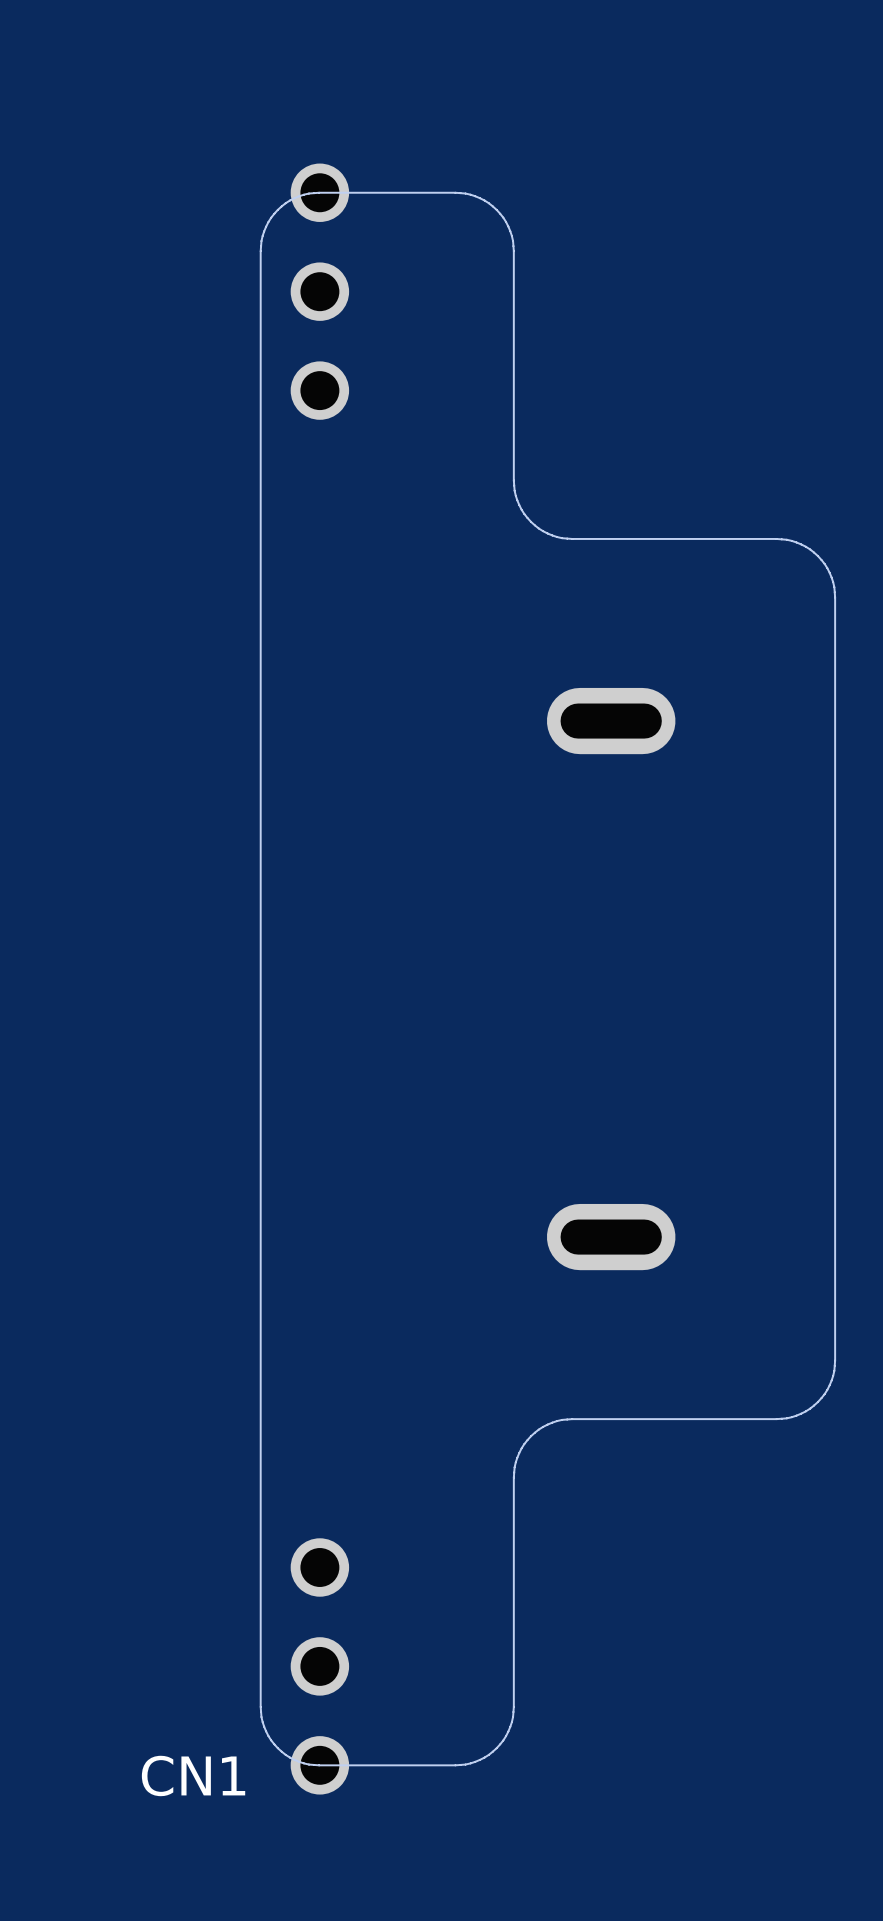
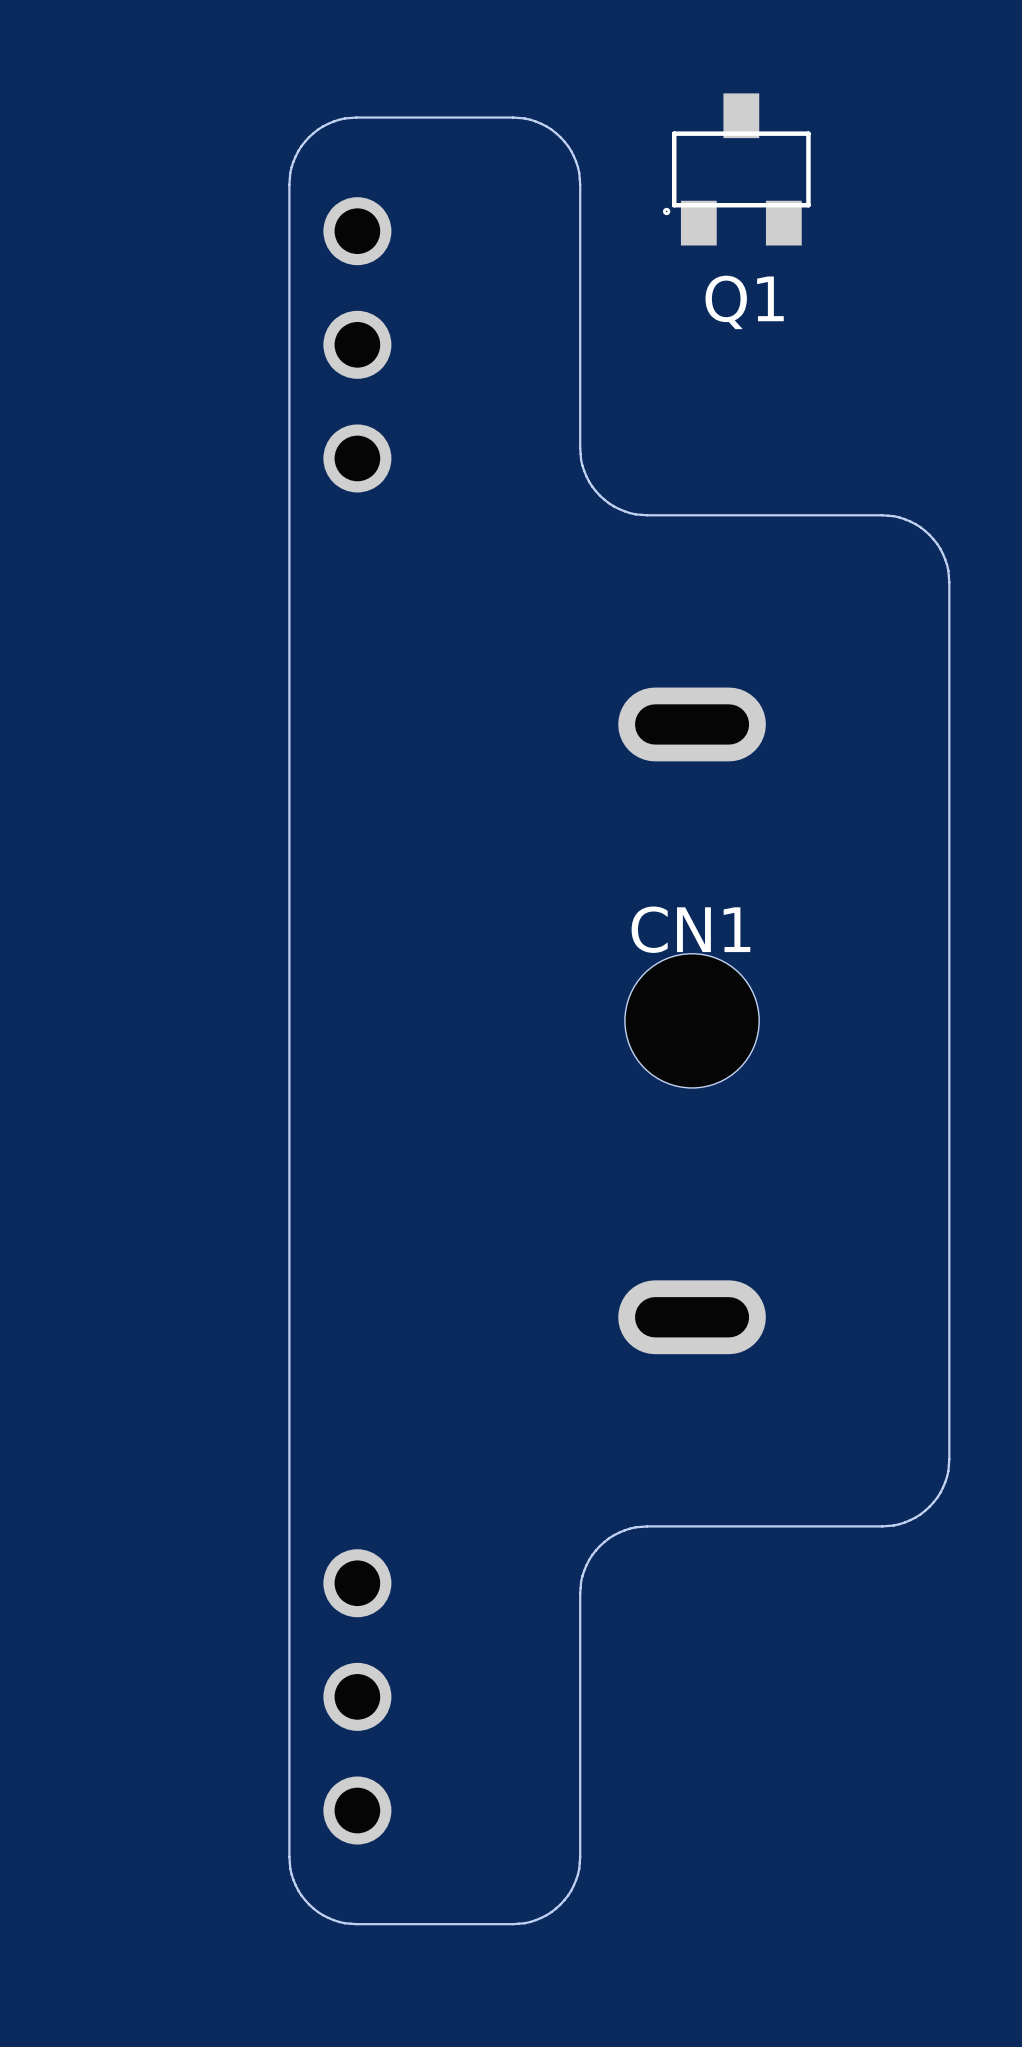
CN1 footprint: [290, 163, 676, 1795] -> [323, 197, 766, 1845]
Q1: none -> (736, 169)
CN1 name position: CN1 (193, 1775) -> CN1 (690, 929)

